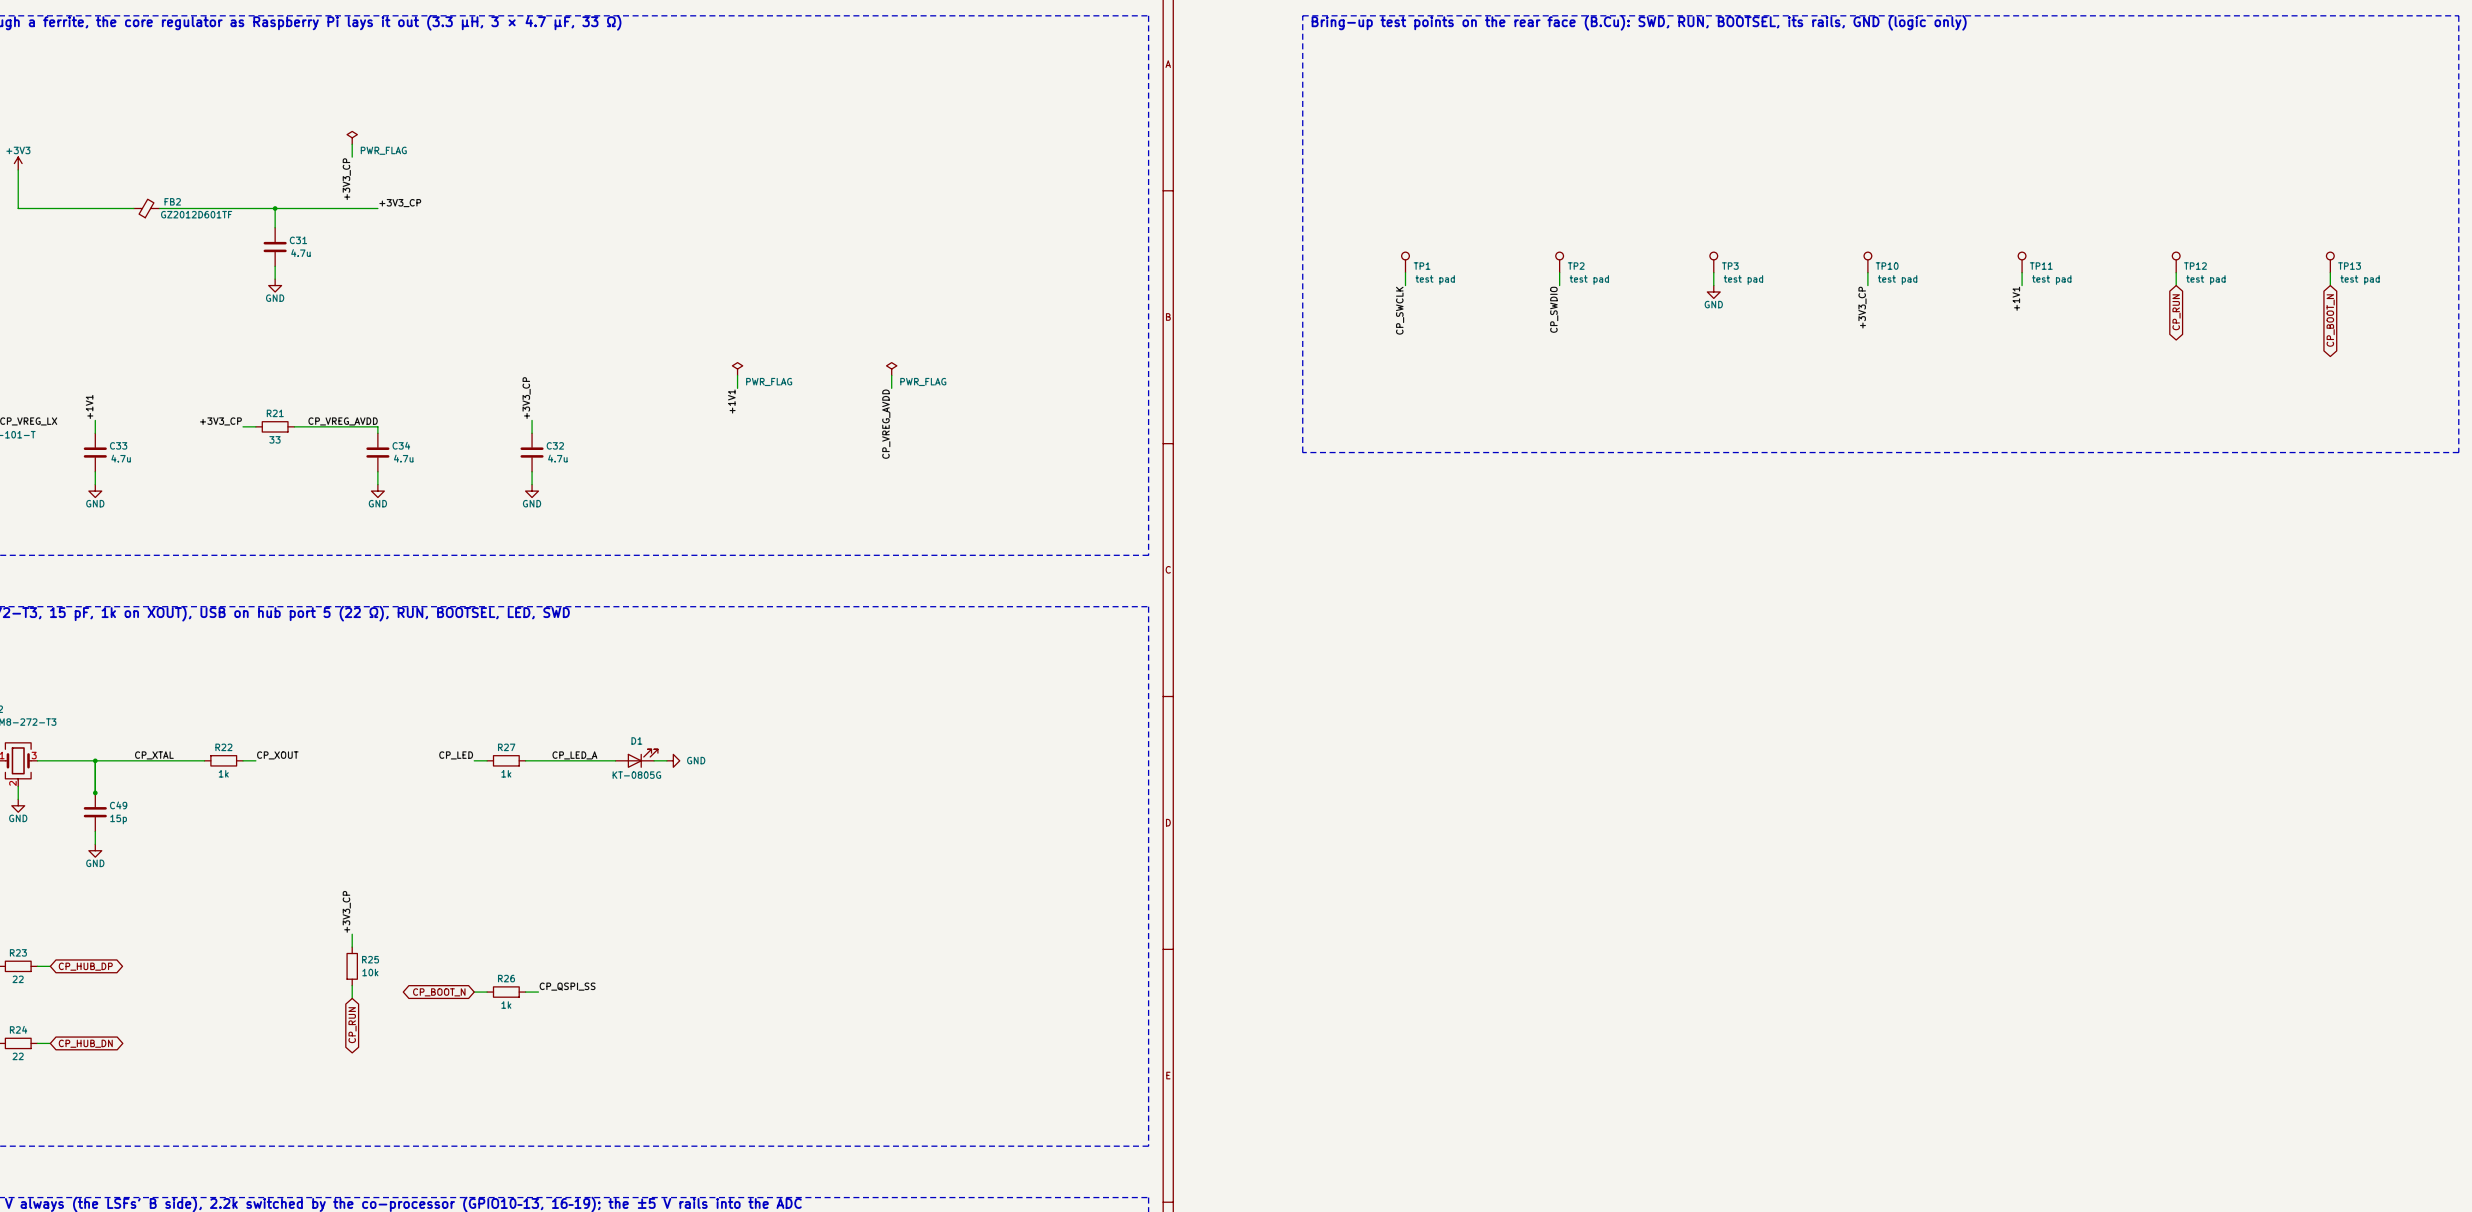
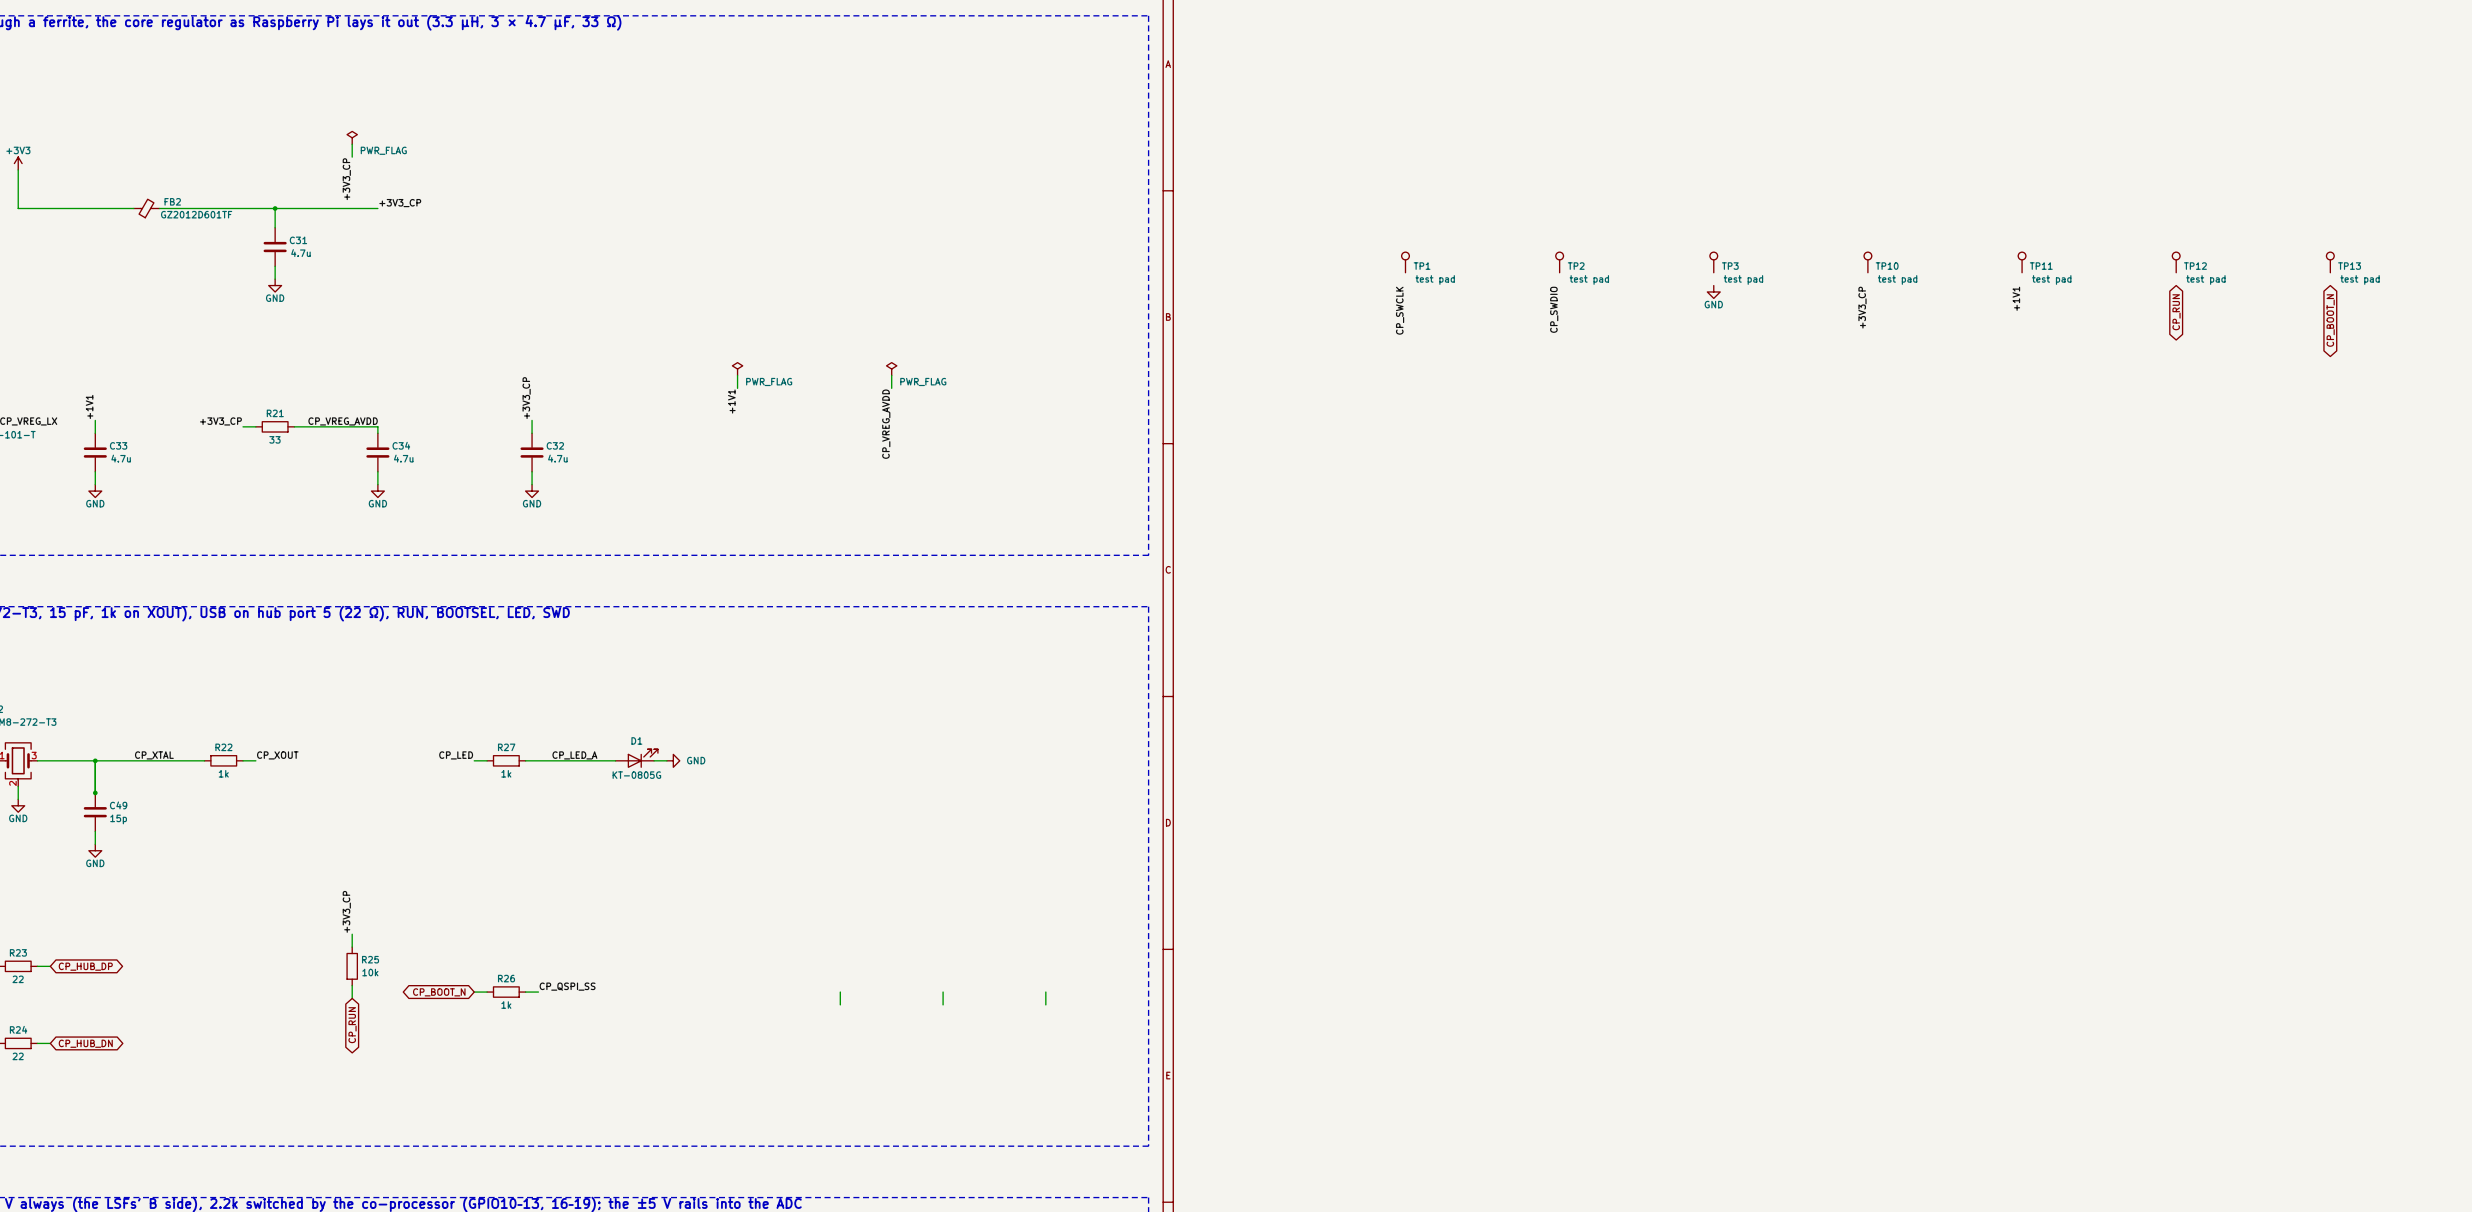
line: (1302, 15) (2458, 15) (2458, 452) (1302, 452) (1302, 15) -> none
text: Bring-up test points on the rear face (B.Cu): SWD, RUN, BOOTSEL, its rails, GND (logic only) (1639, 22) -> none
wire: (1405, 272) (1405, 285) -> none
wire: (1559, 272) (1559, 285) -> none
wire: (1713, 272) (1713, 285) -> none
wire: (1867, 272) (1867, 285) -> none
wire: (2022, 272) (2022, 285) -> none
wire: (2176, 272) (2176, 285) -> none
wire: (2330, 272) (2330, 285) -> none
wire: none -> (840, 992) (840, 1004)
wire: none -> (943, 992) (943, 1004)
wire: none -> (1045, 992) (1045, 1004)

